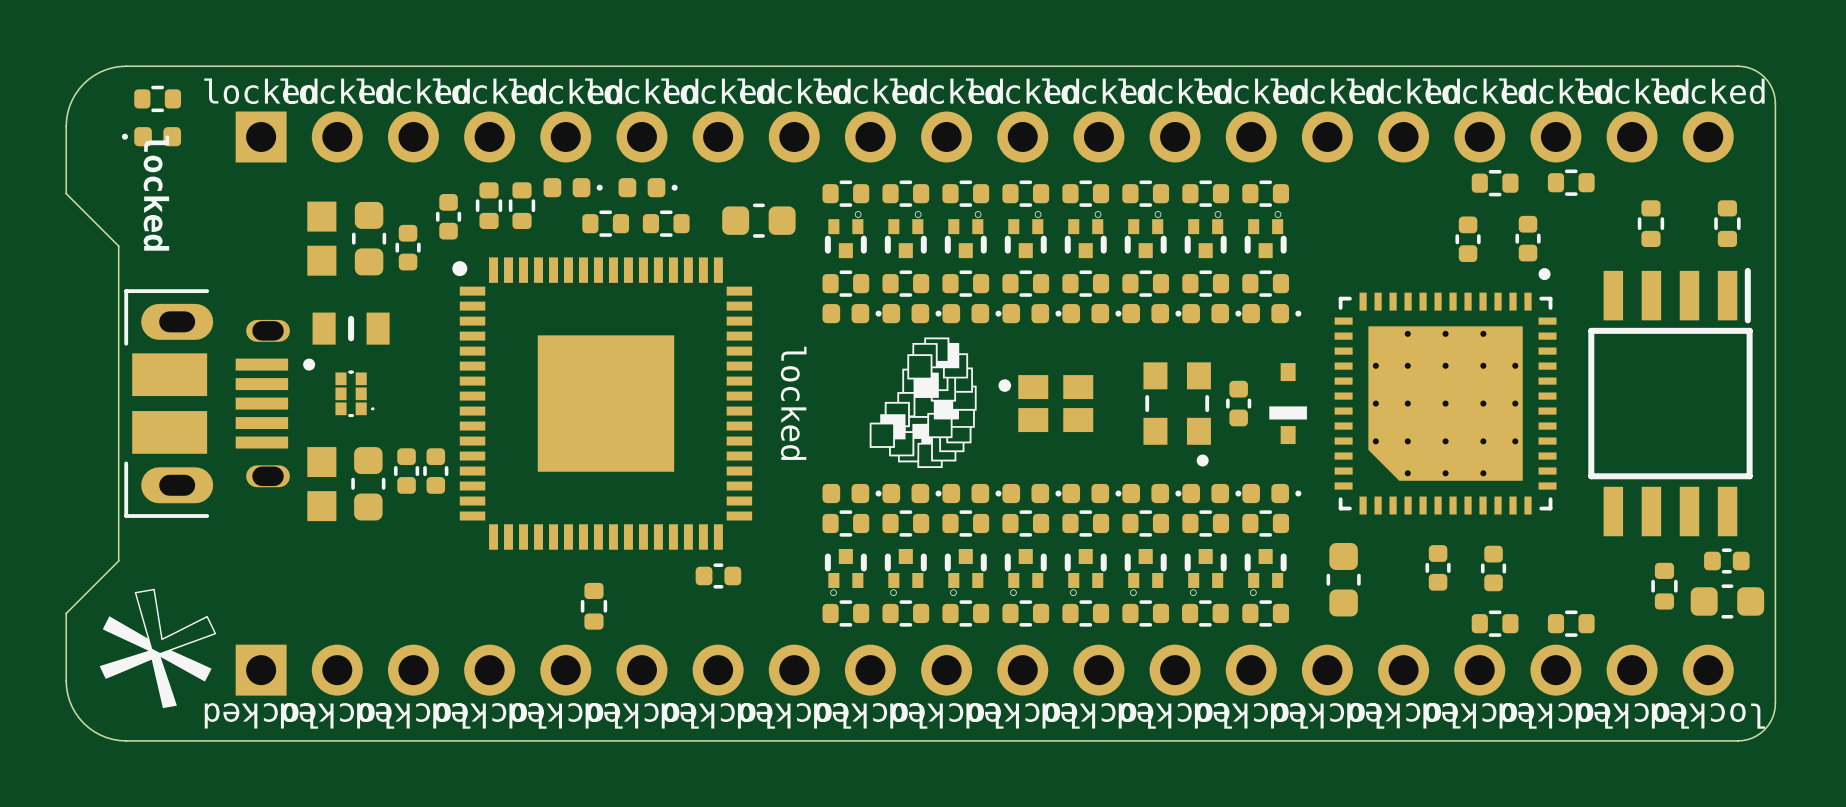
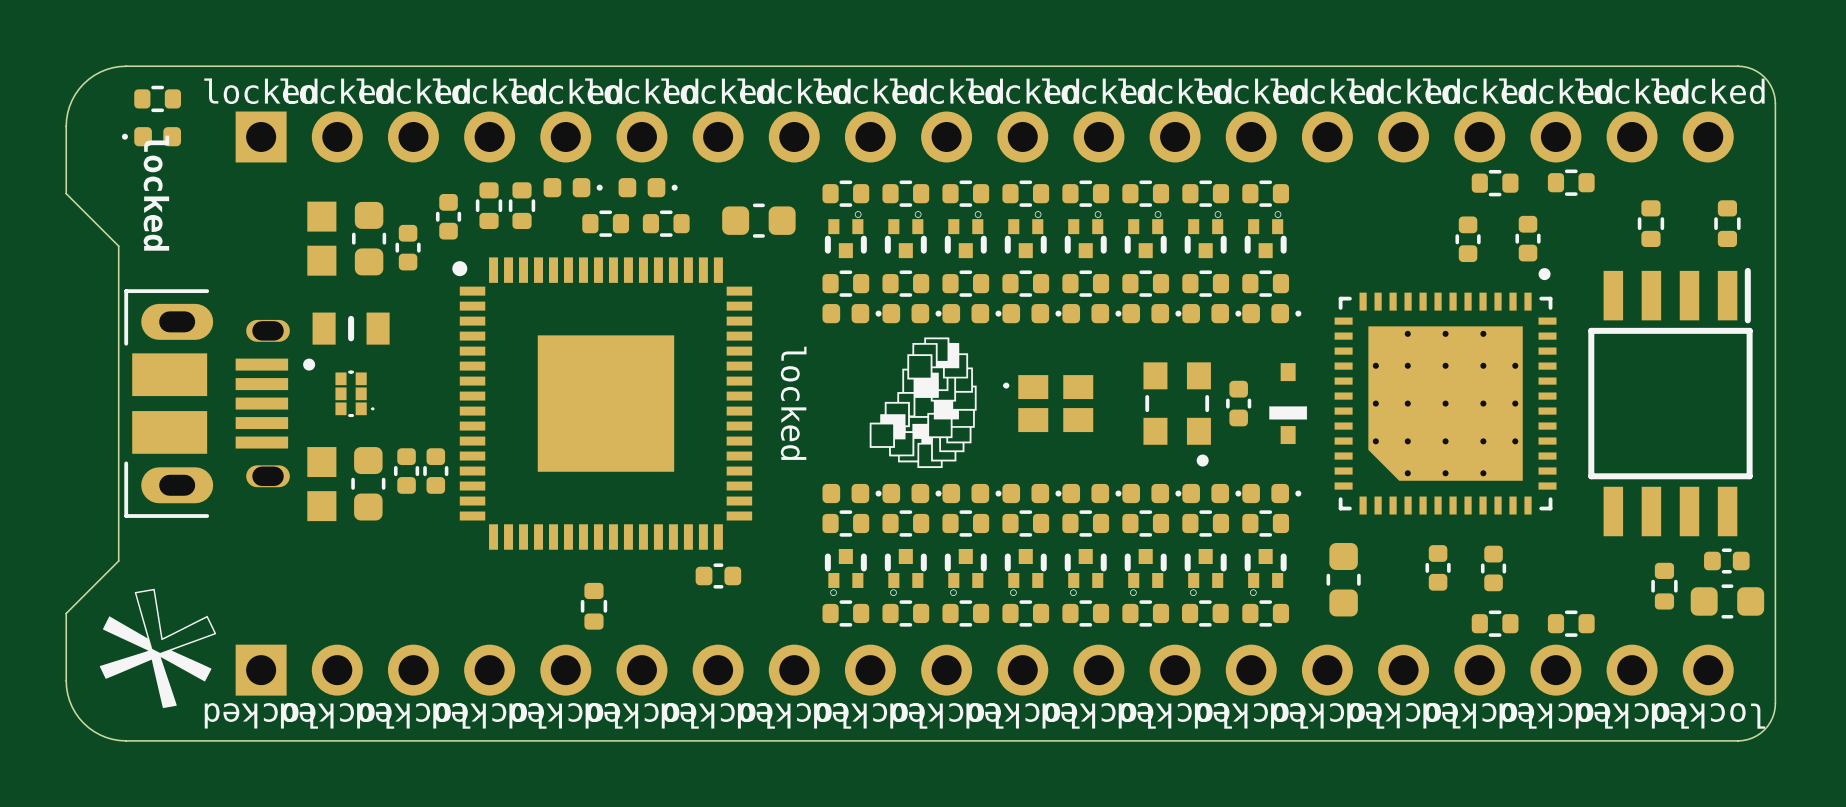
part footprint: [998, 375, 1094, 433] -> [1003, 375, 1094, 433]

